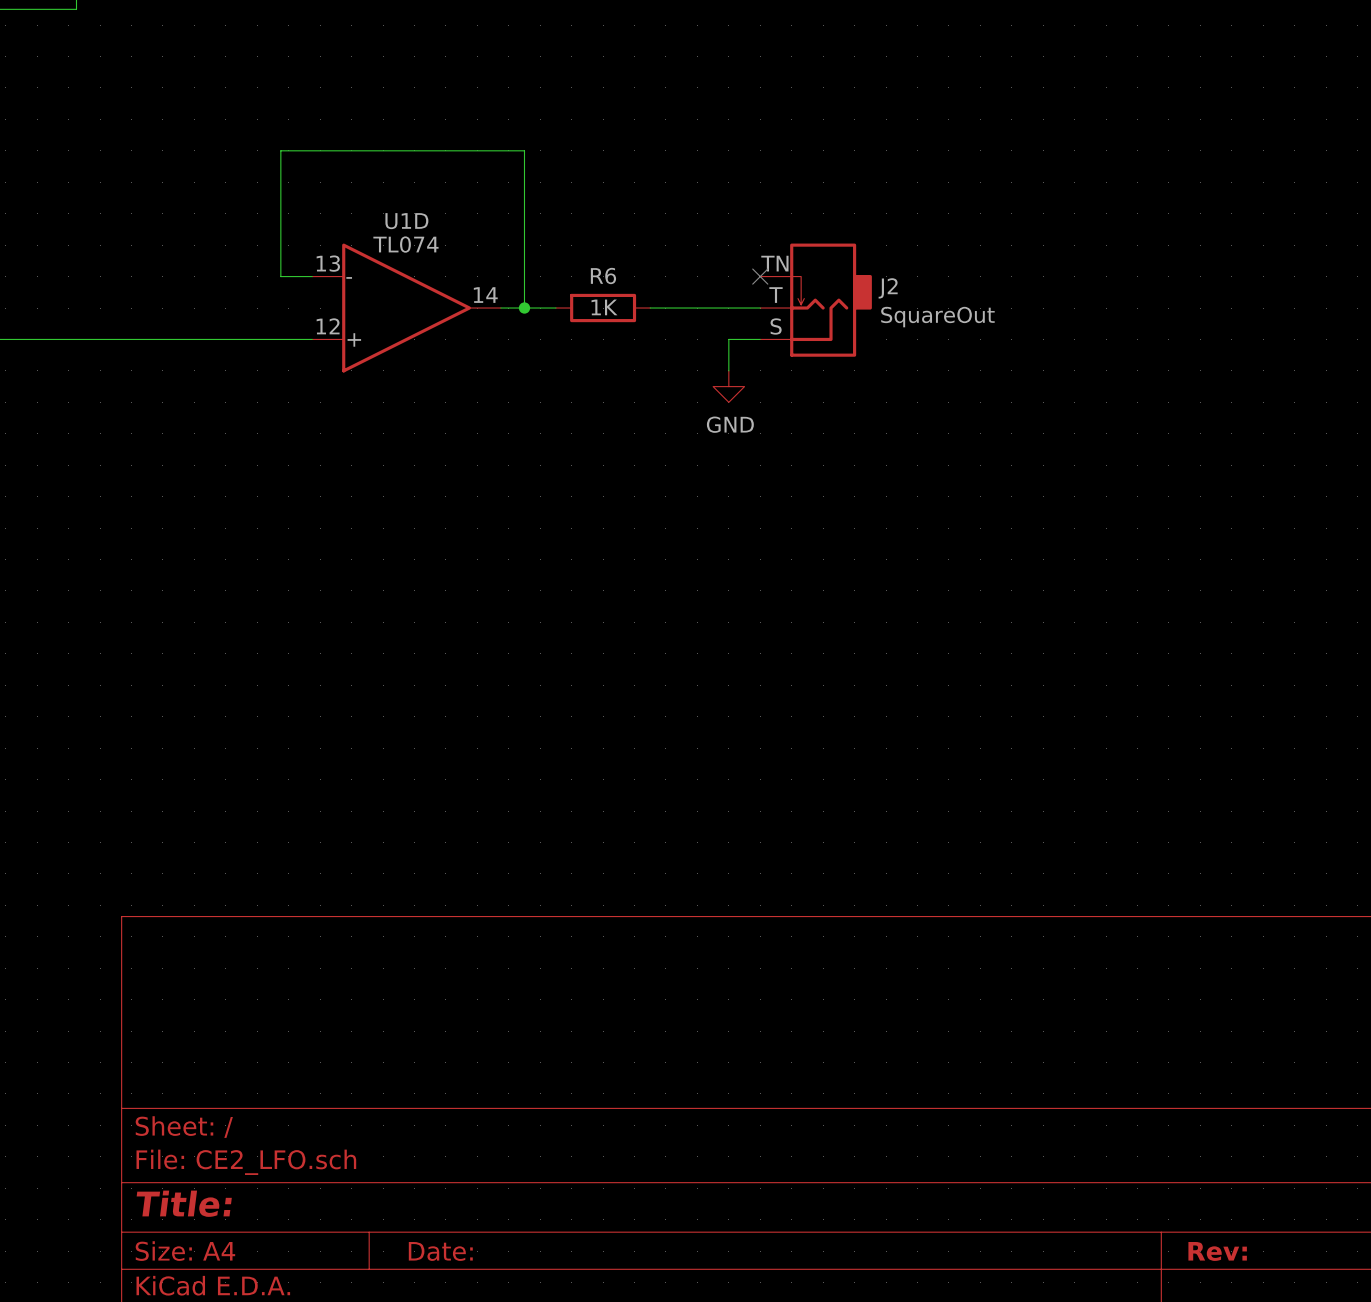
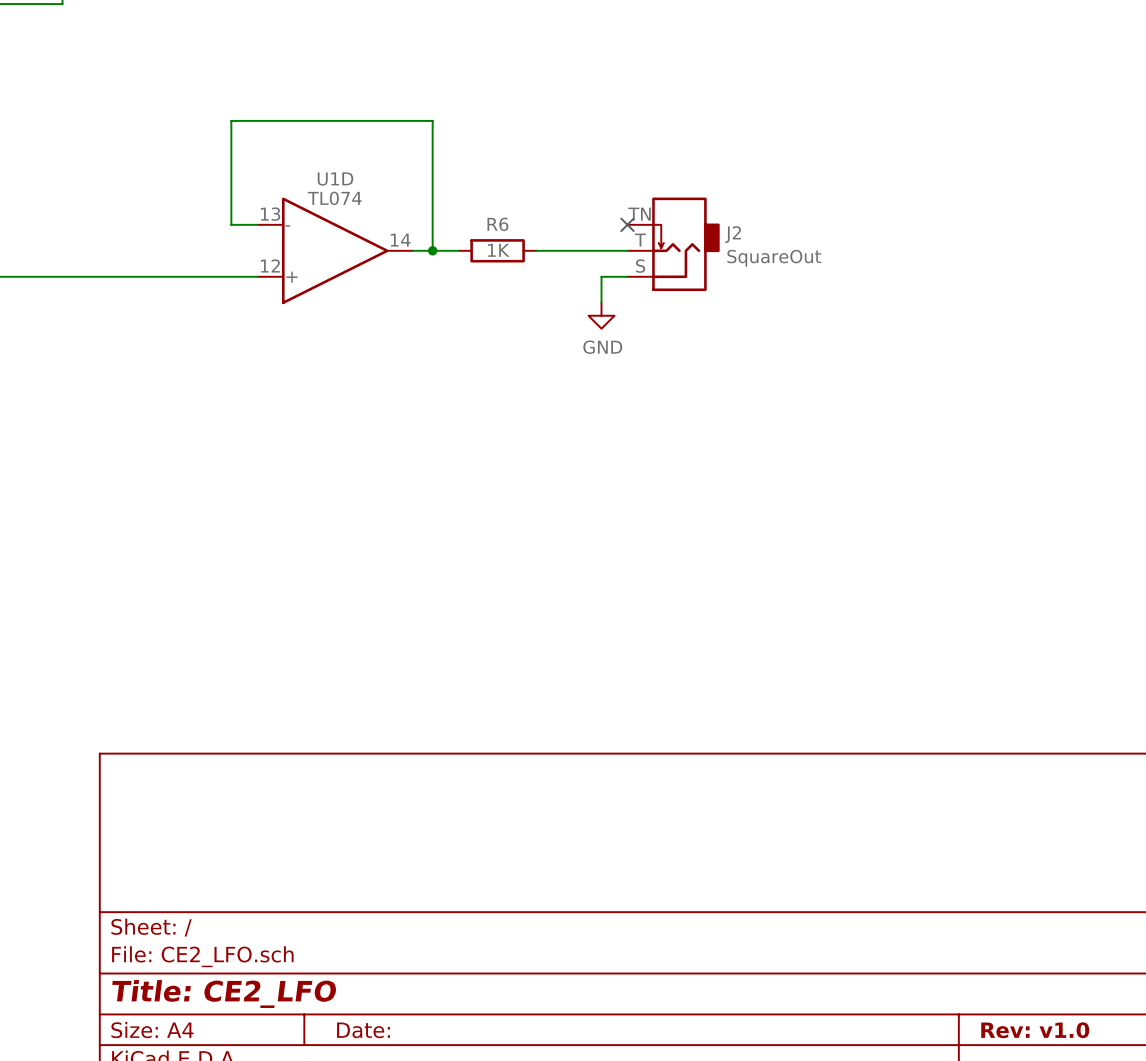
title block: Title: (184, 1203) -> Title: CE2_LFO (224, 994)
title block: Rev: (1217, 1251) -> Rev: v1.0 (1035, 1030)

